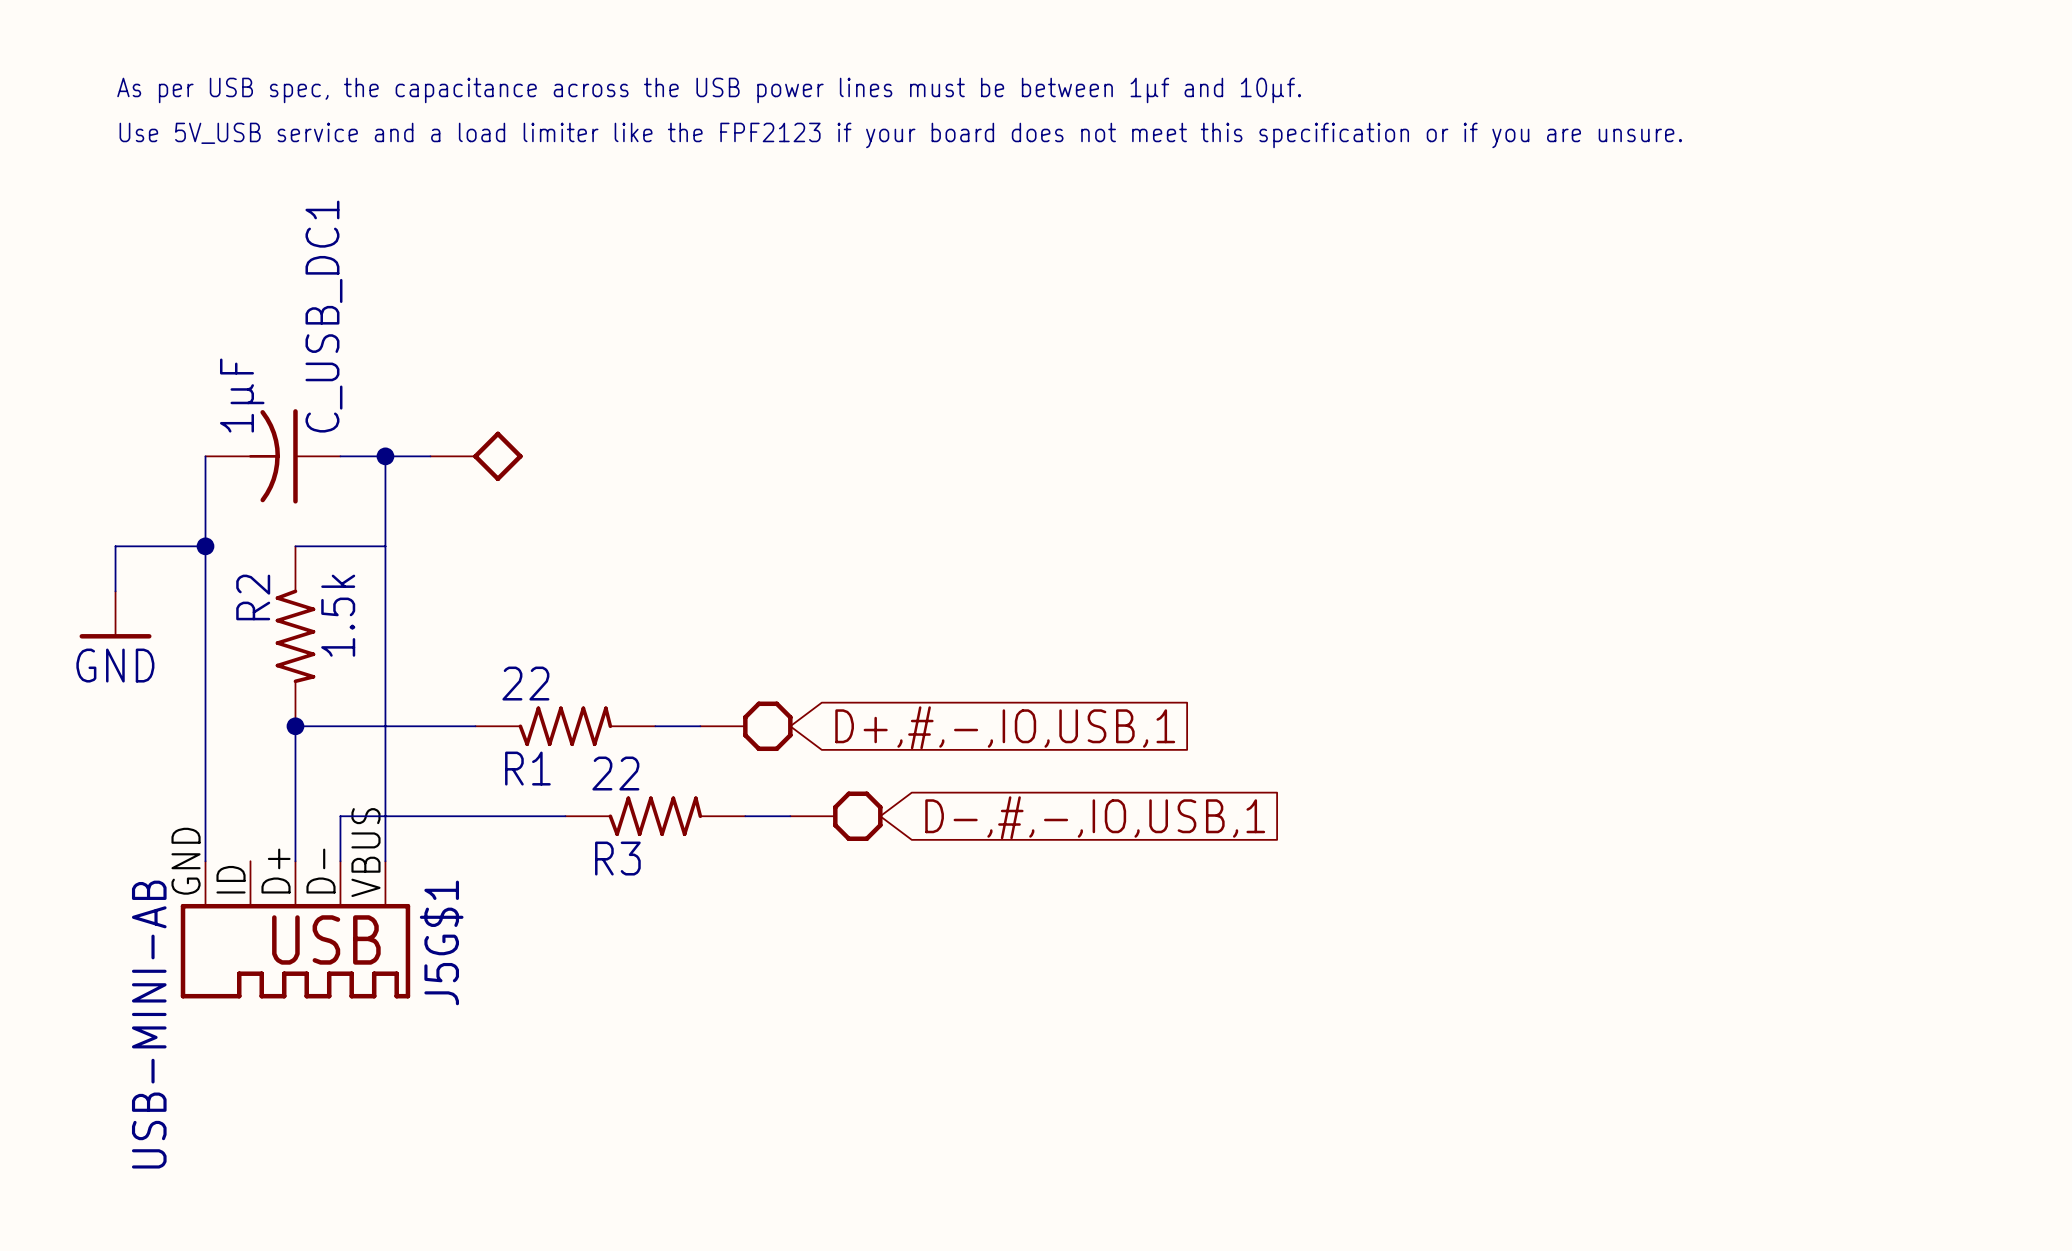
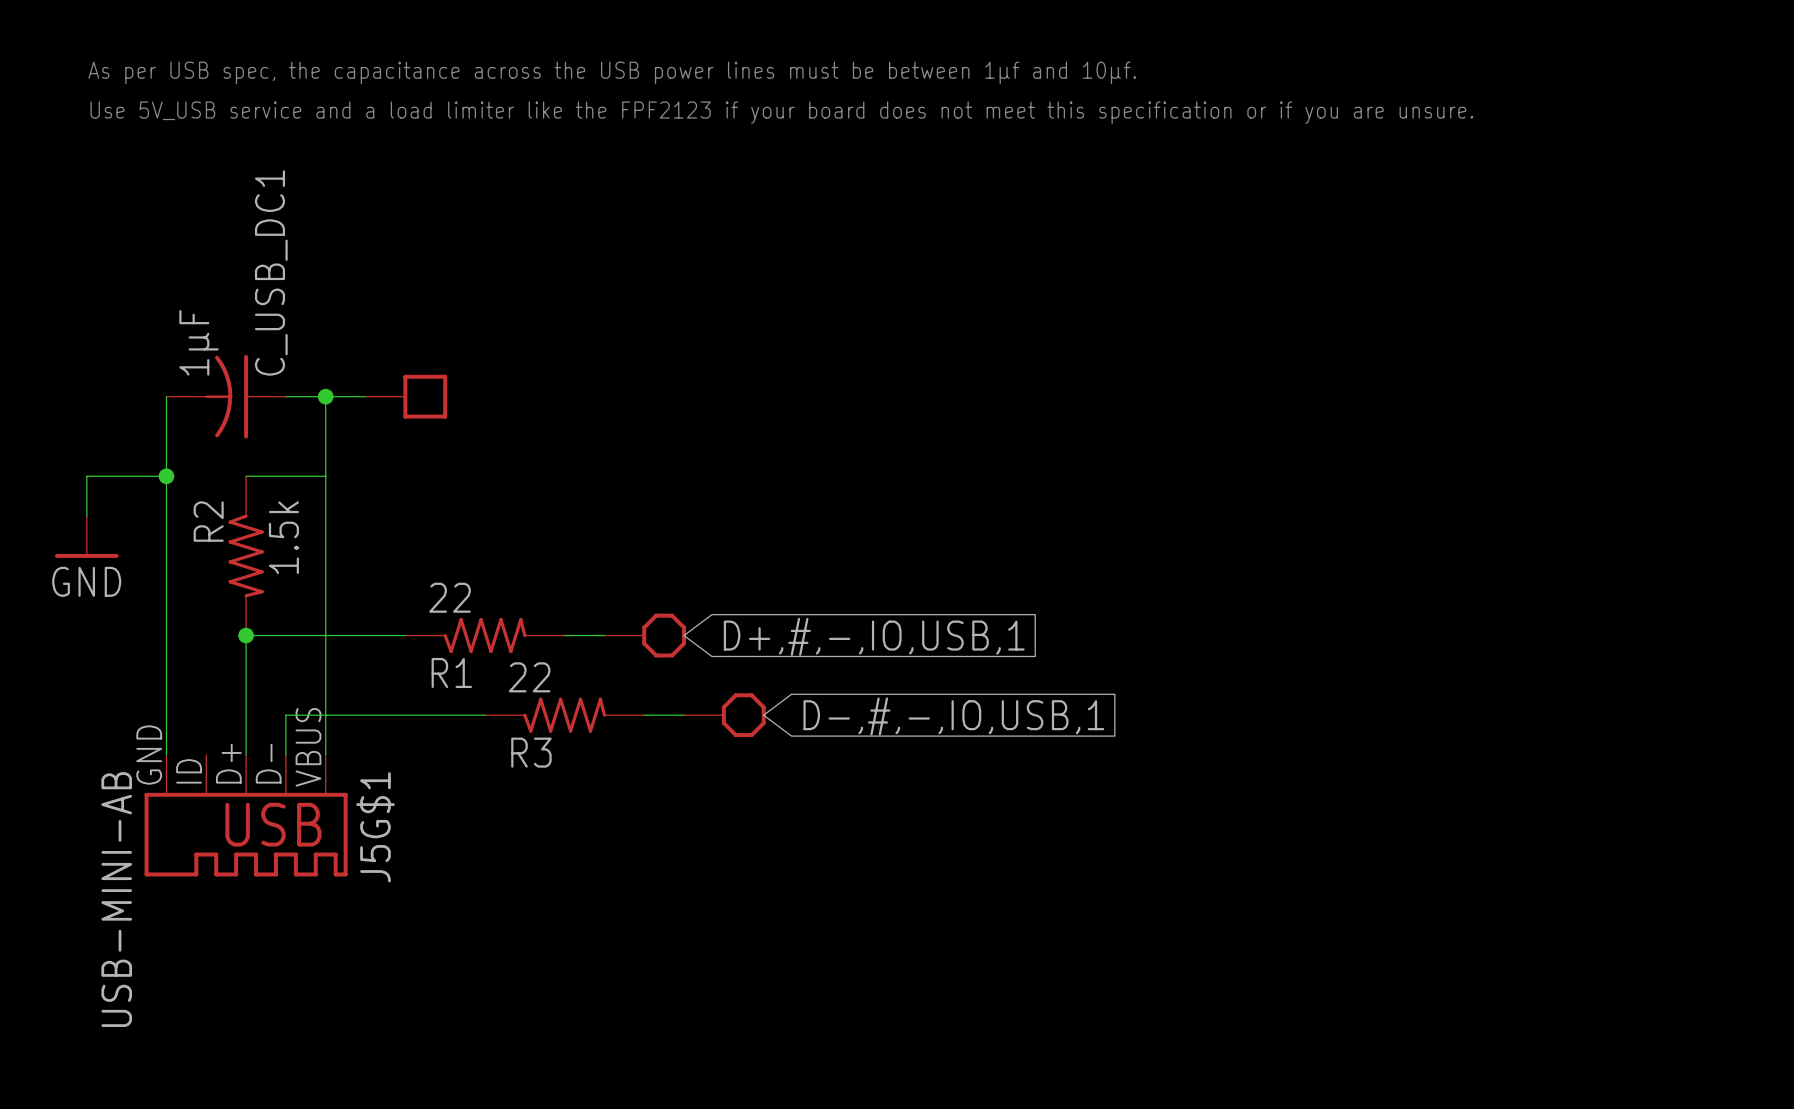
power symbol shape: [430, 431, 523, 482] -> [365, 374, 448, 419]

